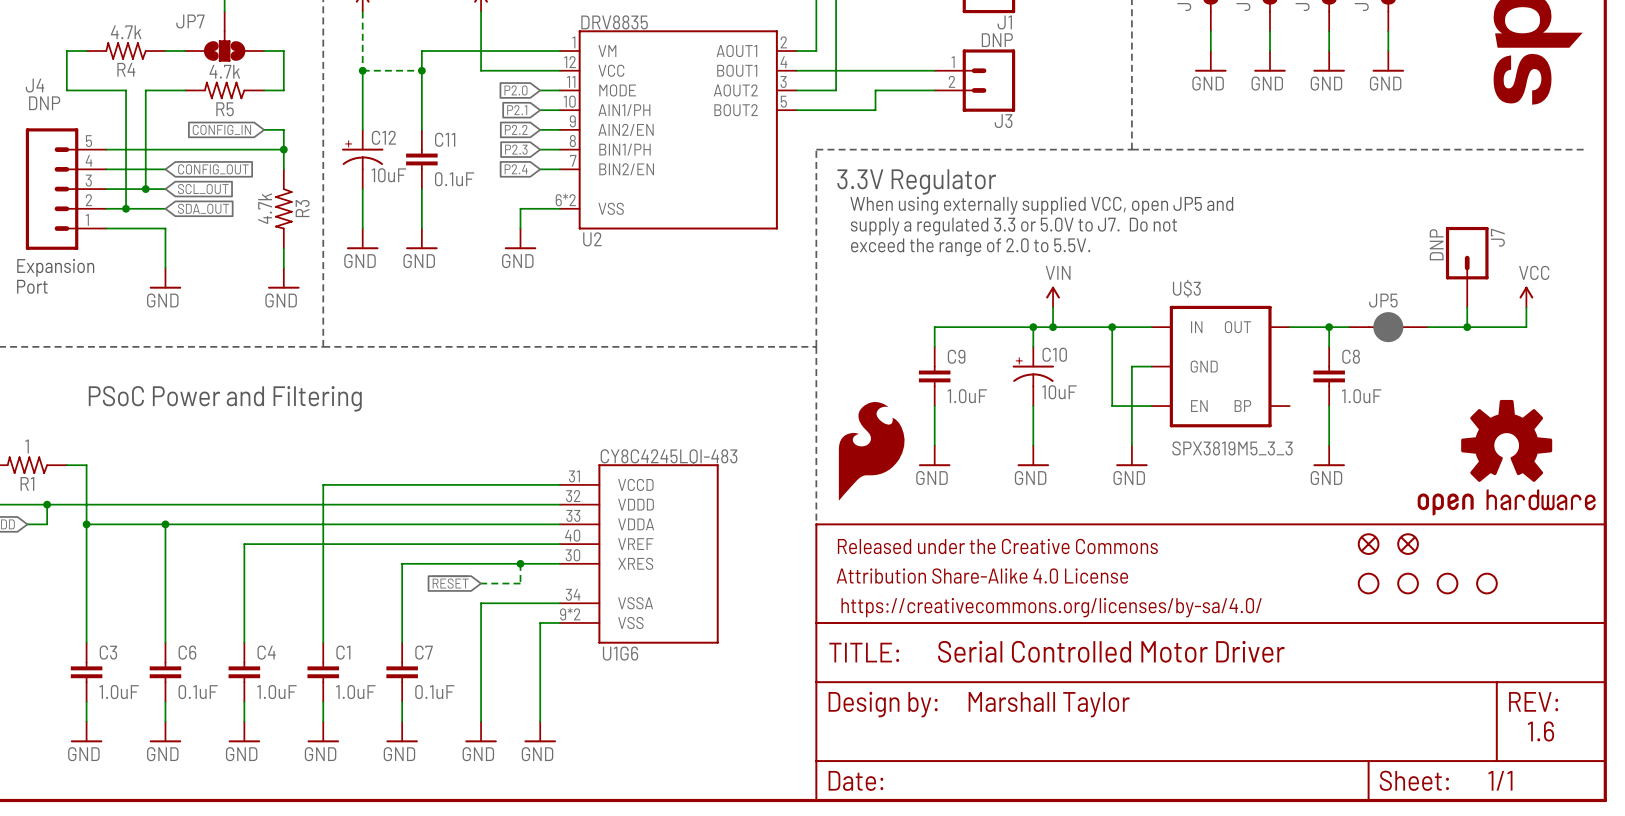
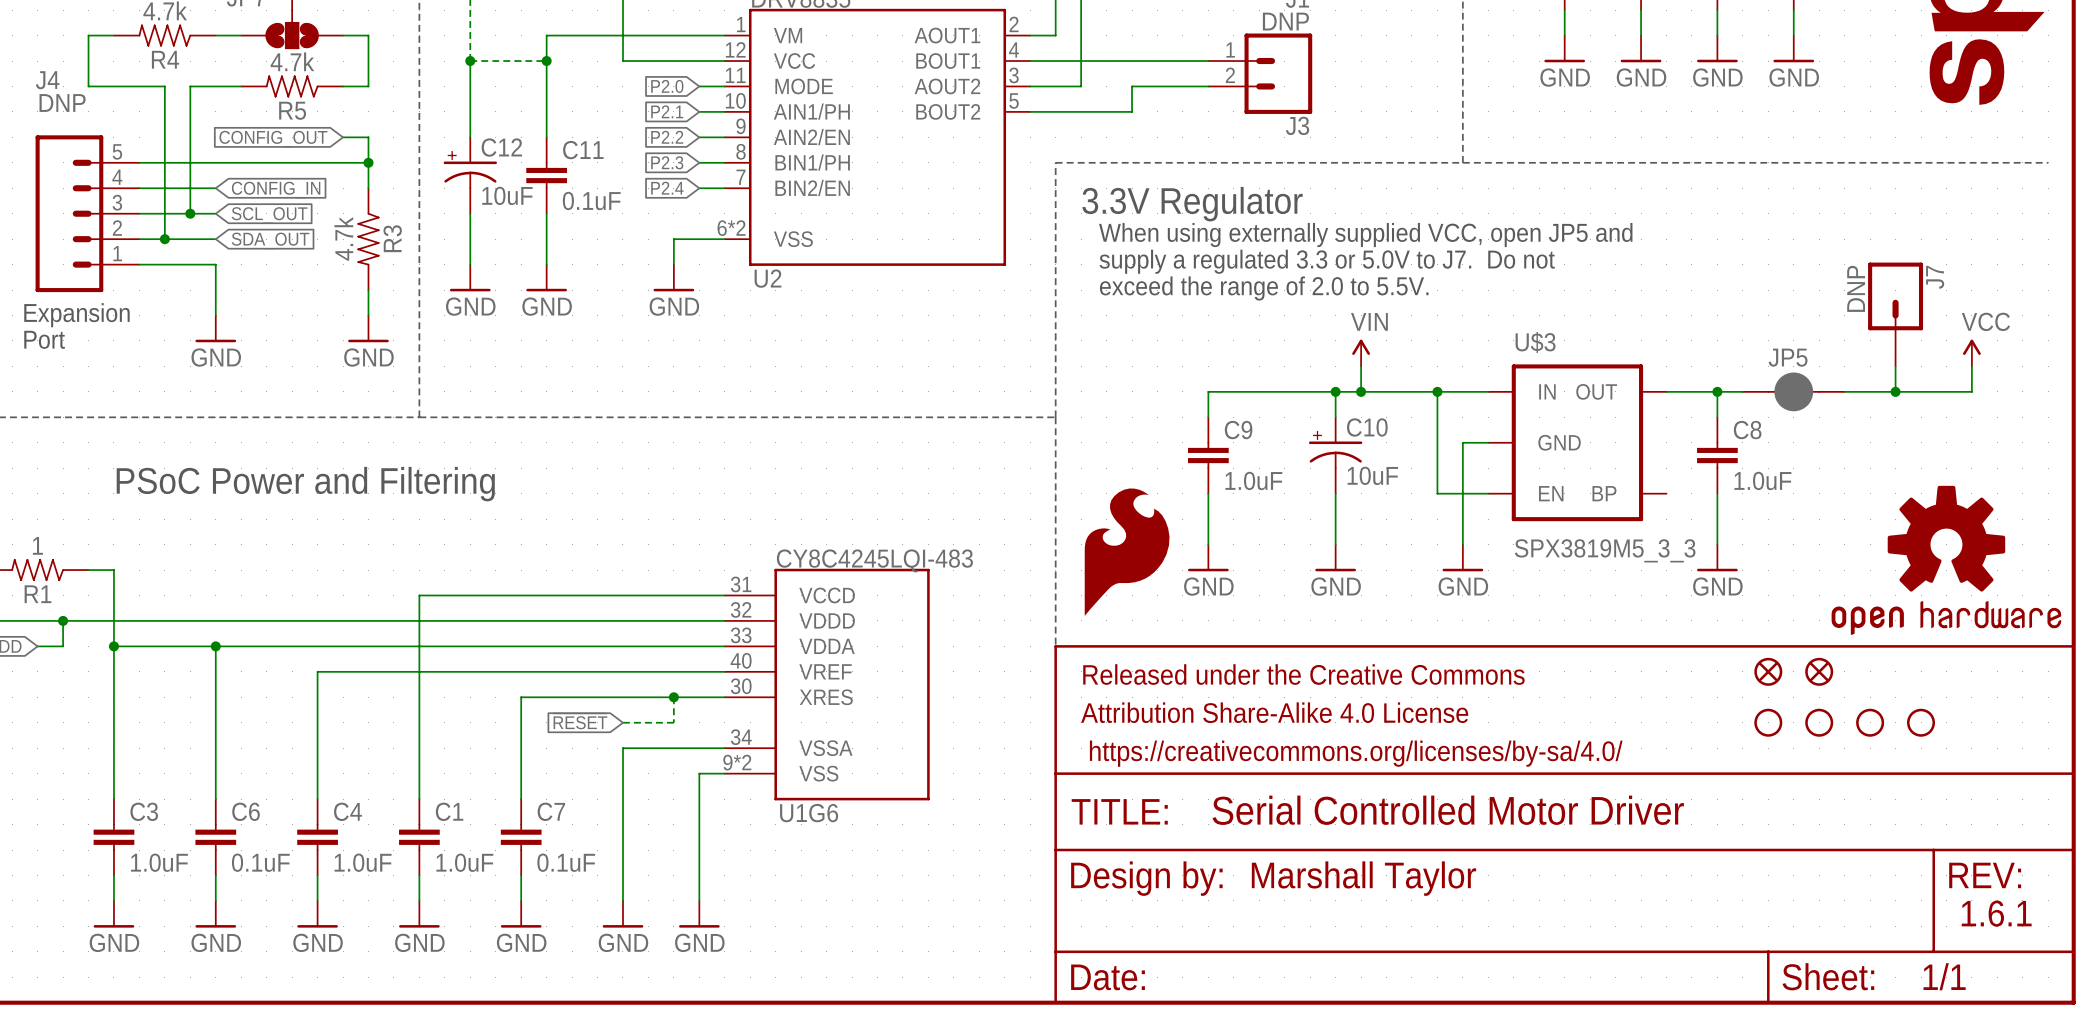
global label: CONFIG_IN (221, 129) -> CONFIG_OUT (273, 139)
global label: CONFIG_OUT (213, 169) -> CONFIG_IN (276, 190)
text: 1.6 (1540, 731) -> 1.6.1 (1996, 913)

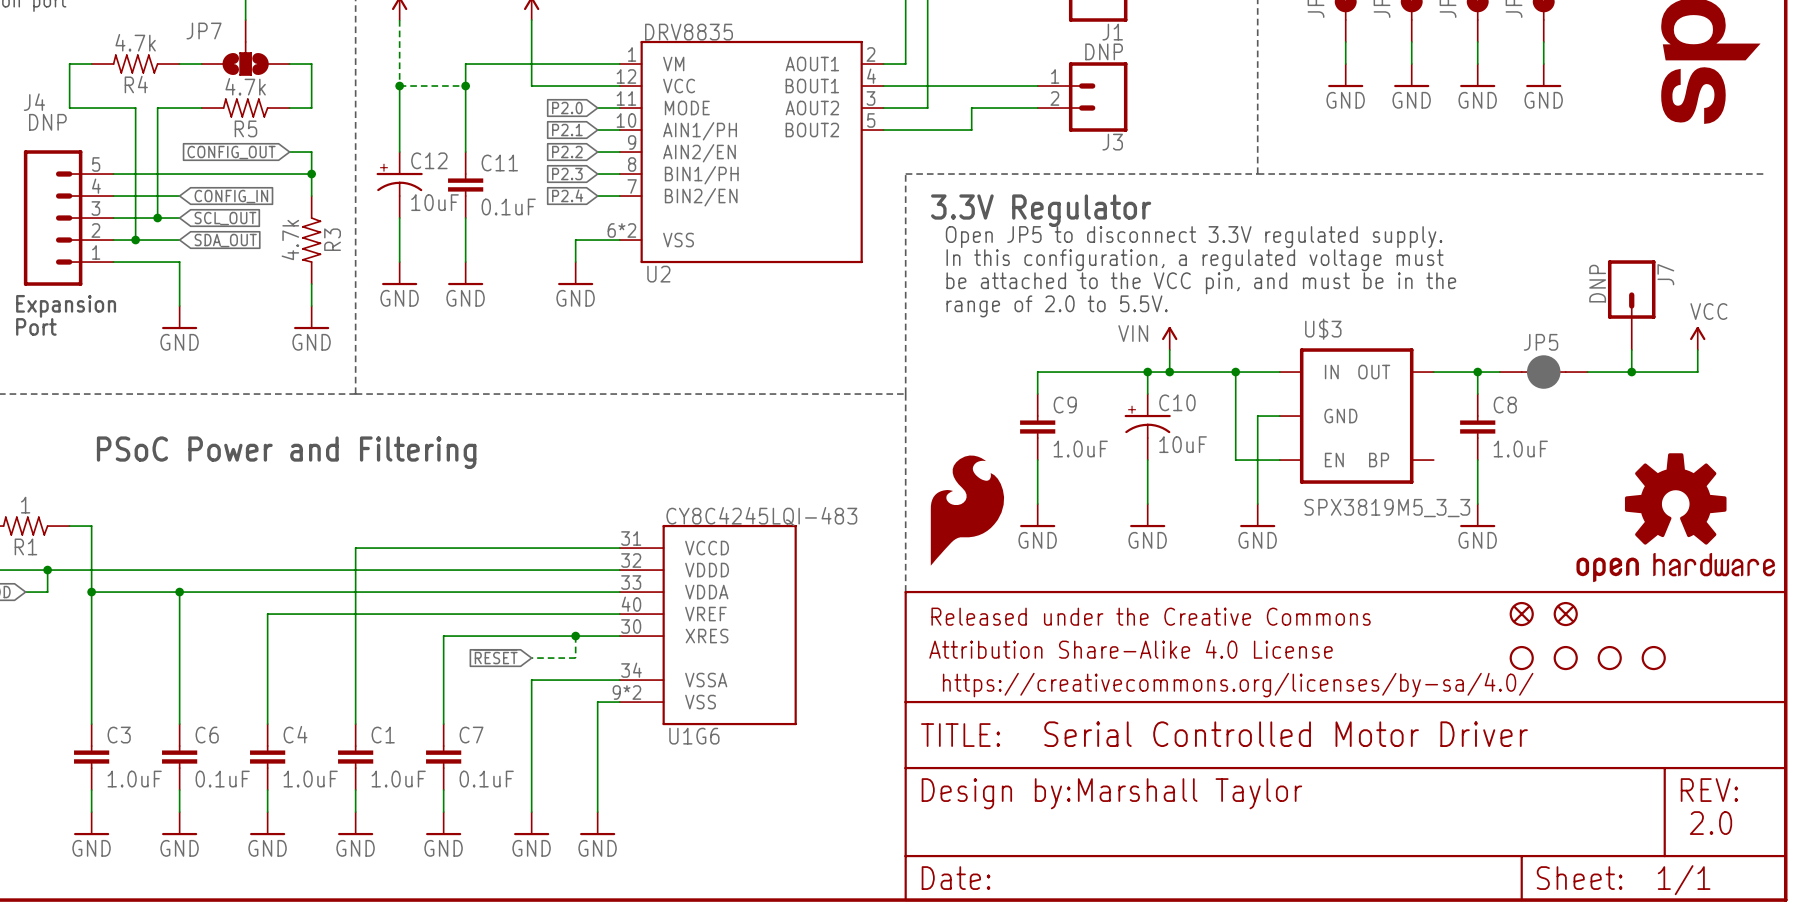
text: When using externally supplied VCC, open JP5 and (1365, 235) -> Open JP5 to disconnect 3.3V regulated supply. (1194, 237)
text: supply a regulated 3.3 or 5.0V to J7. Do not (1327, 261) -> In this configuration, a regulated voltage must (1195, 260)
text: exceed the range of 2.0 to 5.5V. (1264, 288) -> be attached to the VCC pin, and must be in the (1201, 283)
text: none -> range of 2.0 to 5.5V. (1057, 306)
power symbol text position: VIN (1369, 321) -> VIN (1133, 333)
text: 1.6.1 (1996, 913) -> 2.0 (1710, 823)

